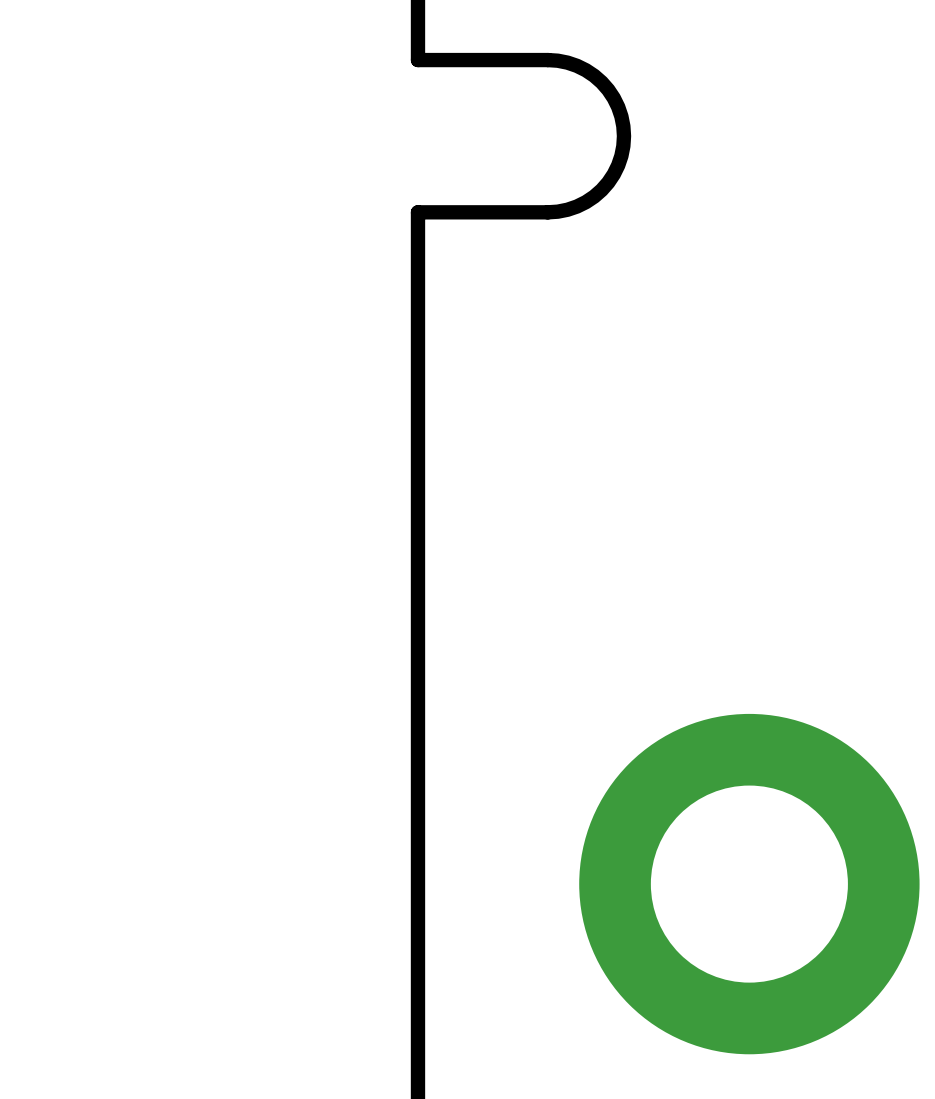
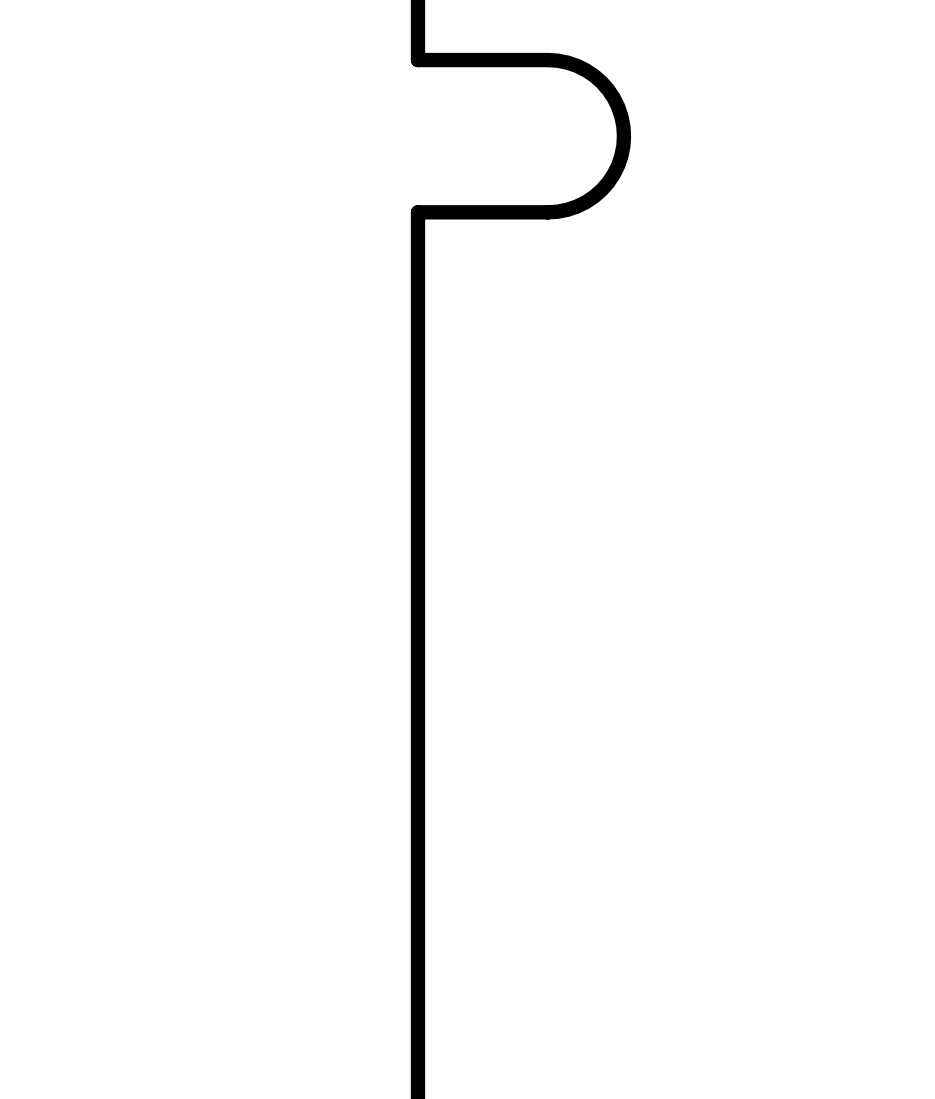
part: (749, 884) -> none

